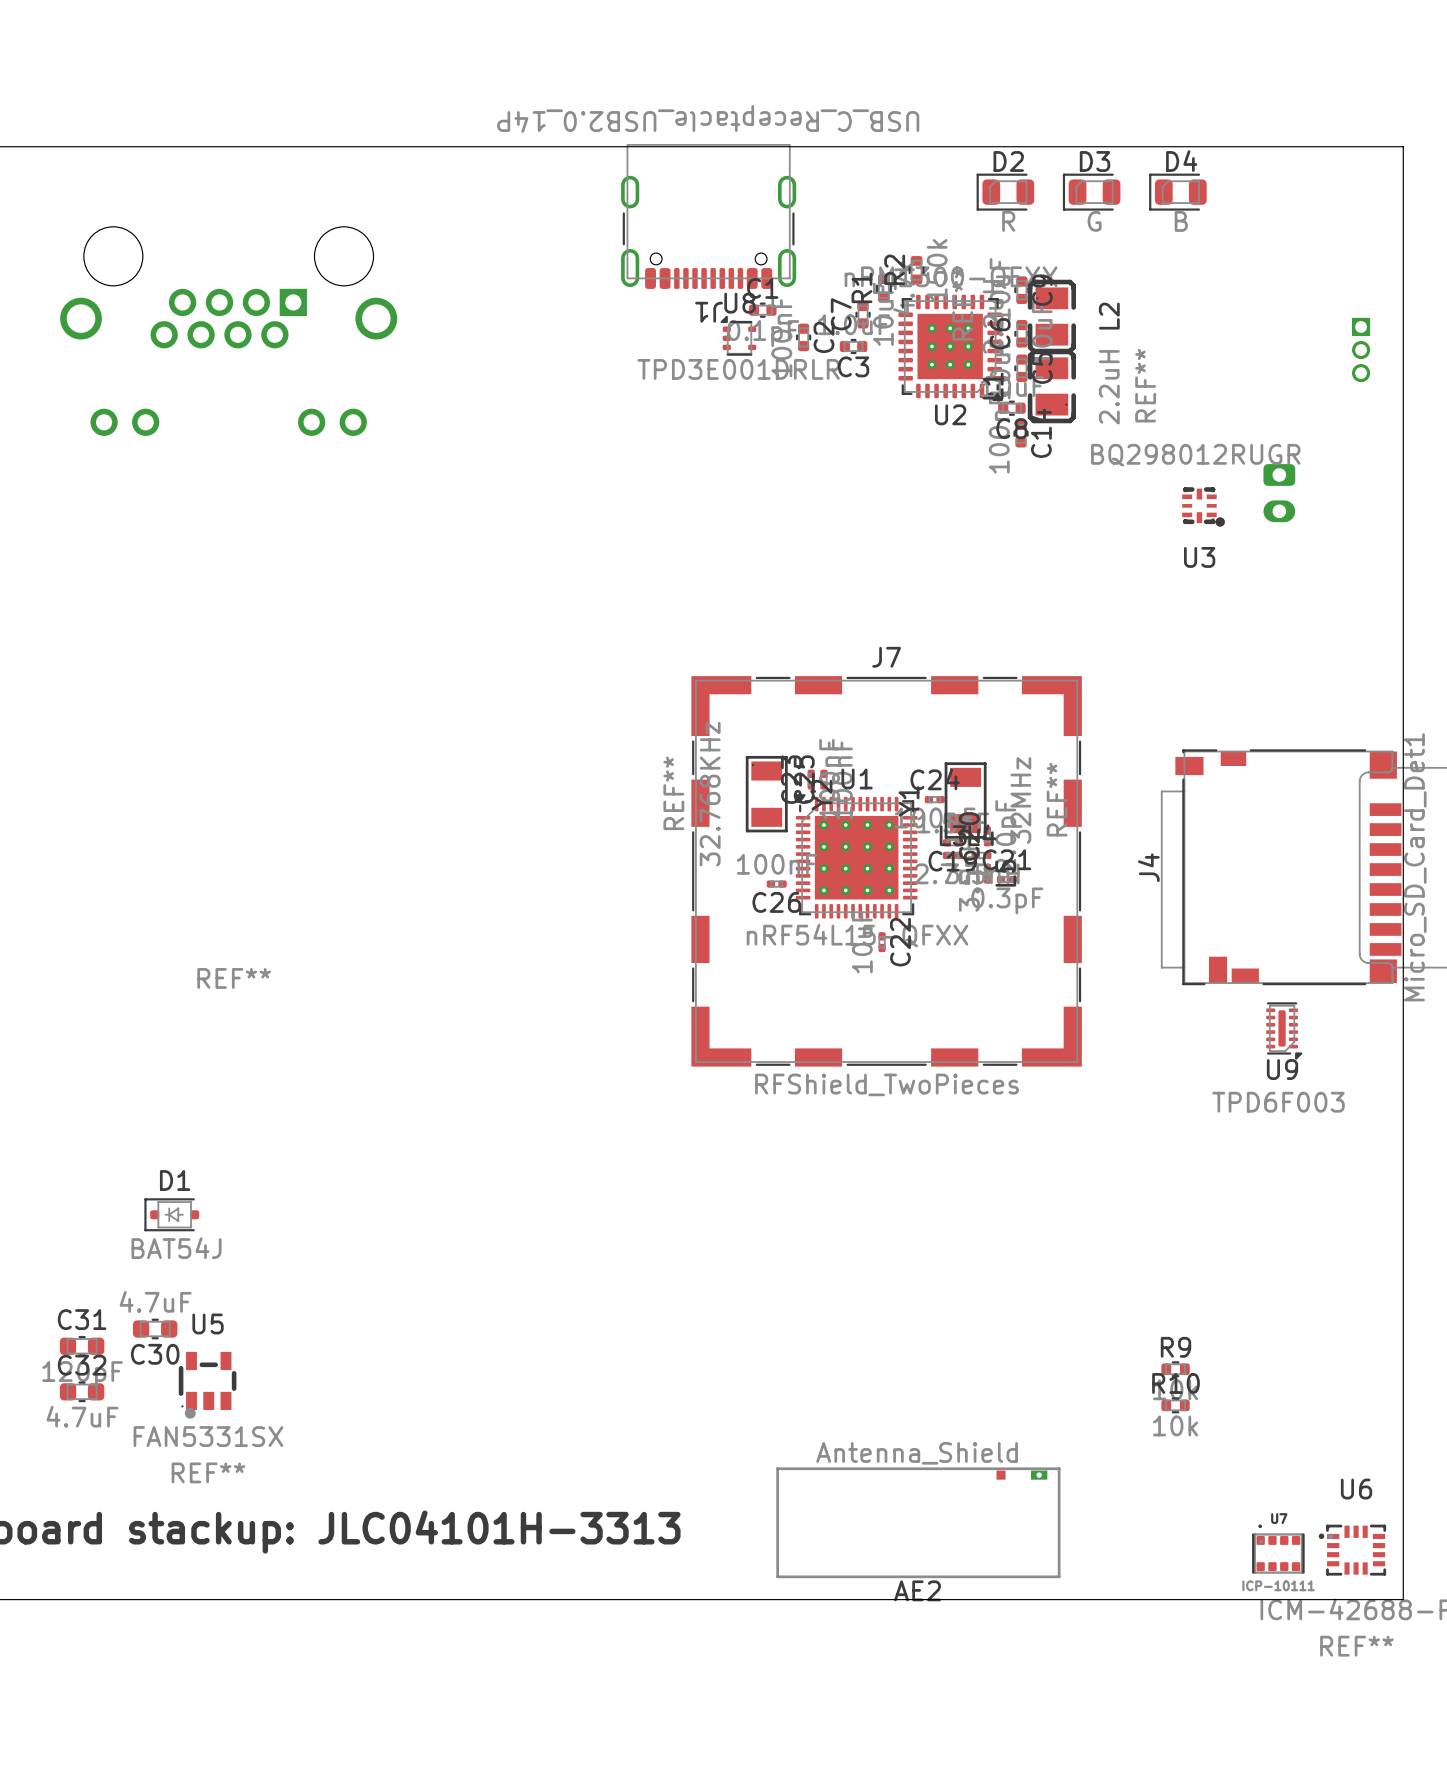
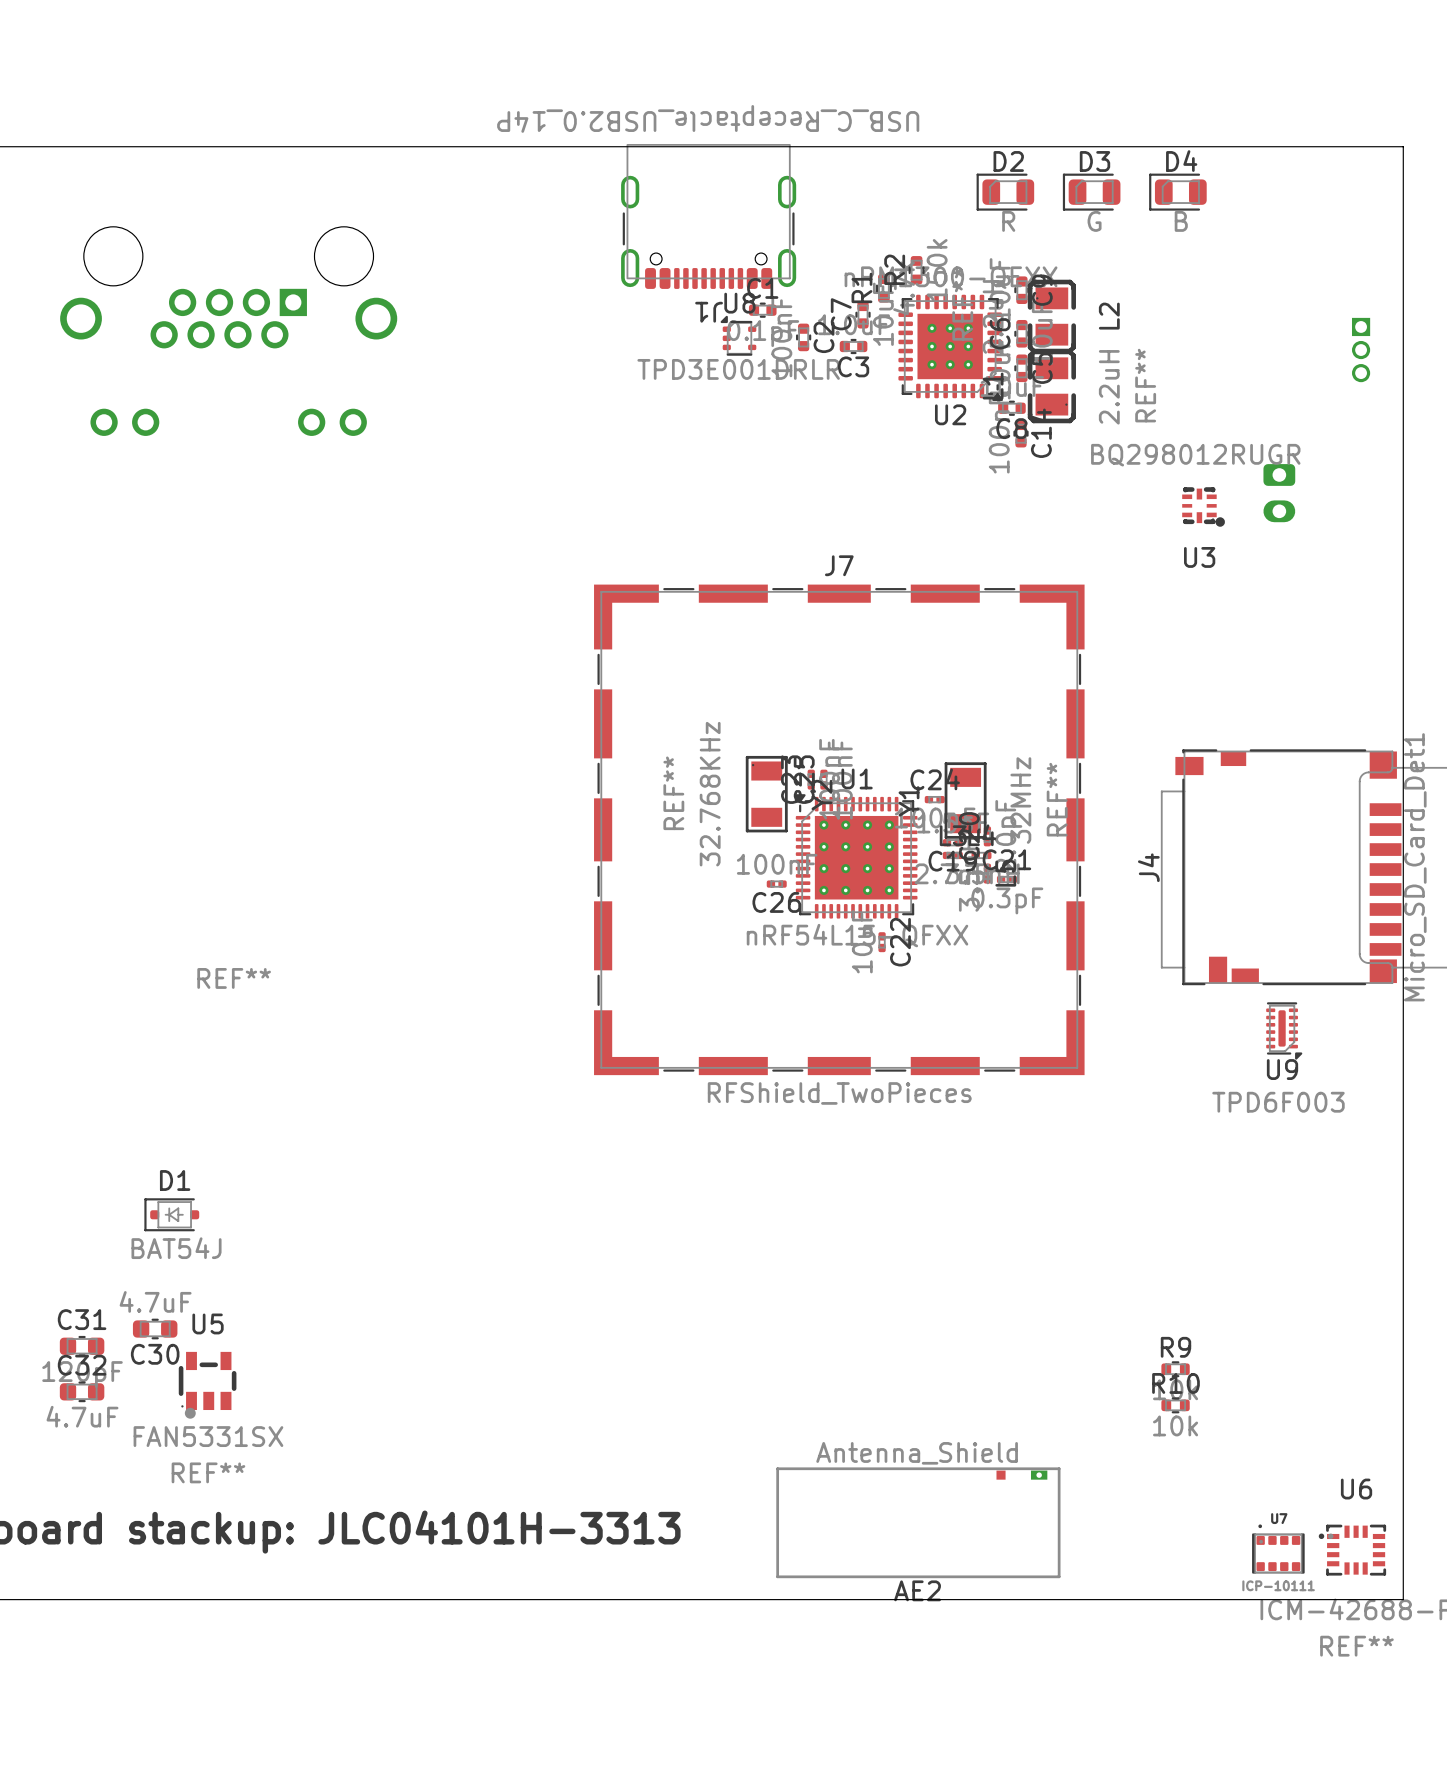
J7 name position: J7 (886, 657) -> J7 (839, 565)
J7 footprint: [691, 676, 1082, 1067] -> [594, 584, 1085, 1076]
J7 value position: RFShield_TwoPieces (887, 1084) -> RFShield_TwoPieces (839, 1093)

